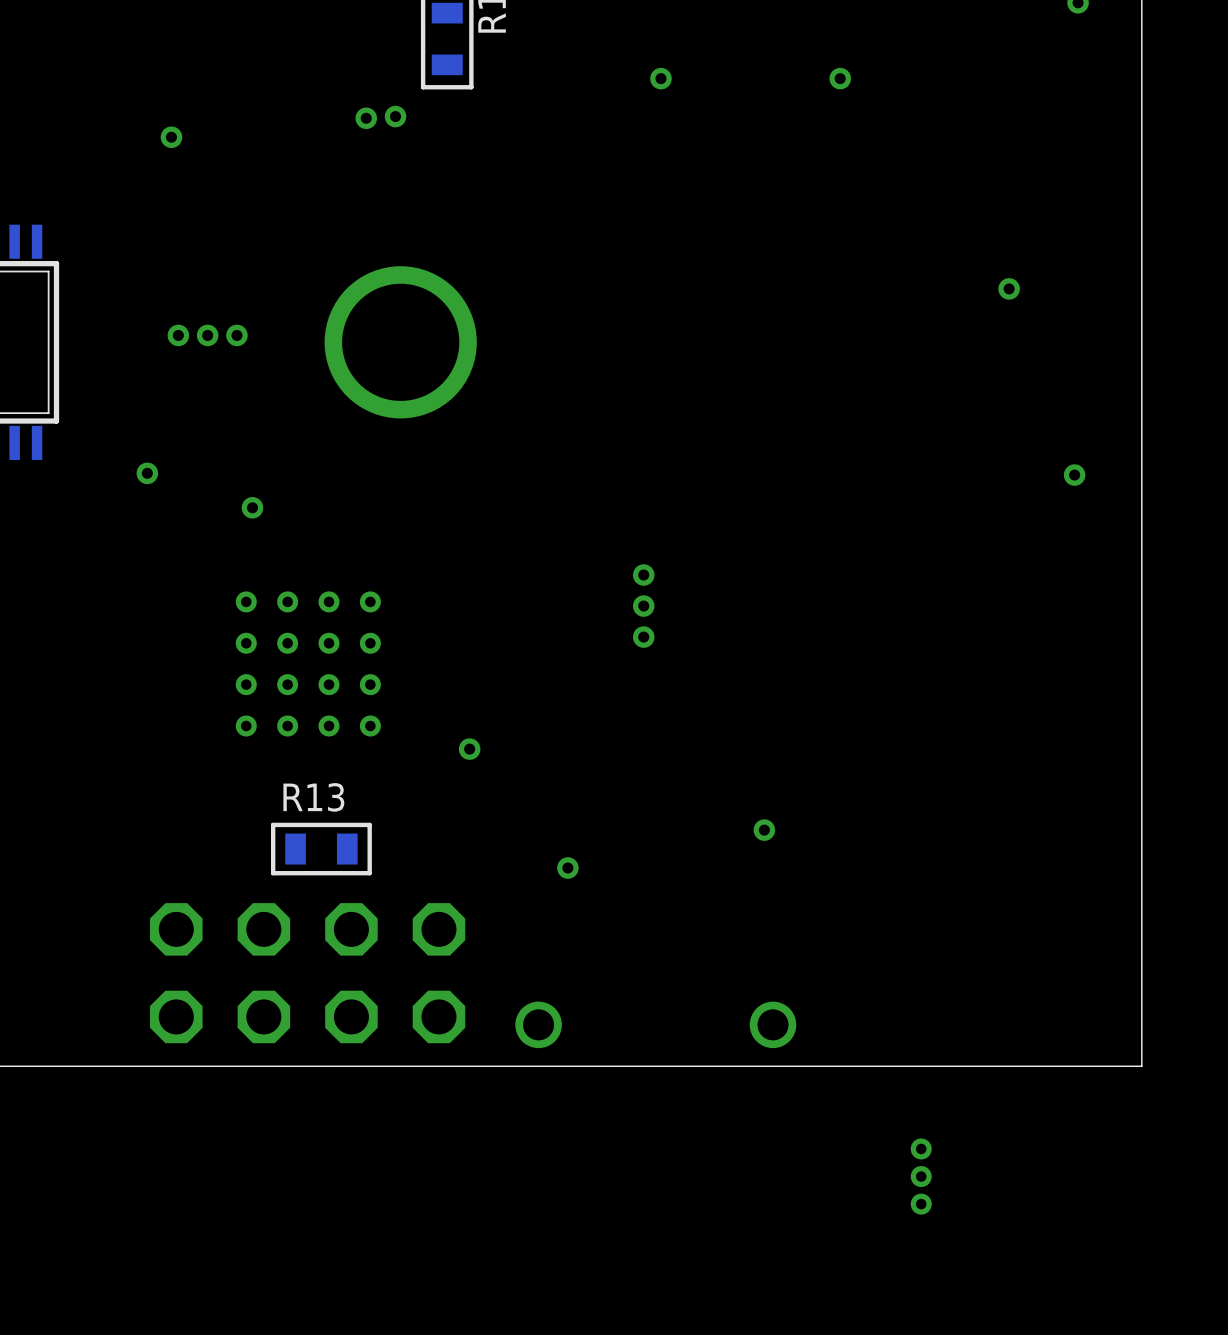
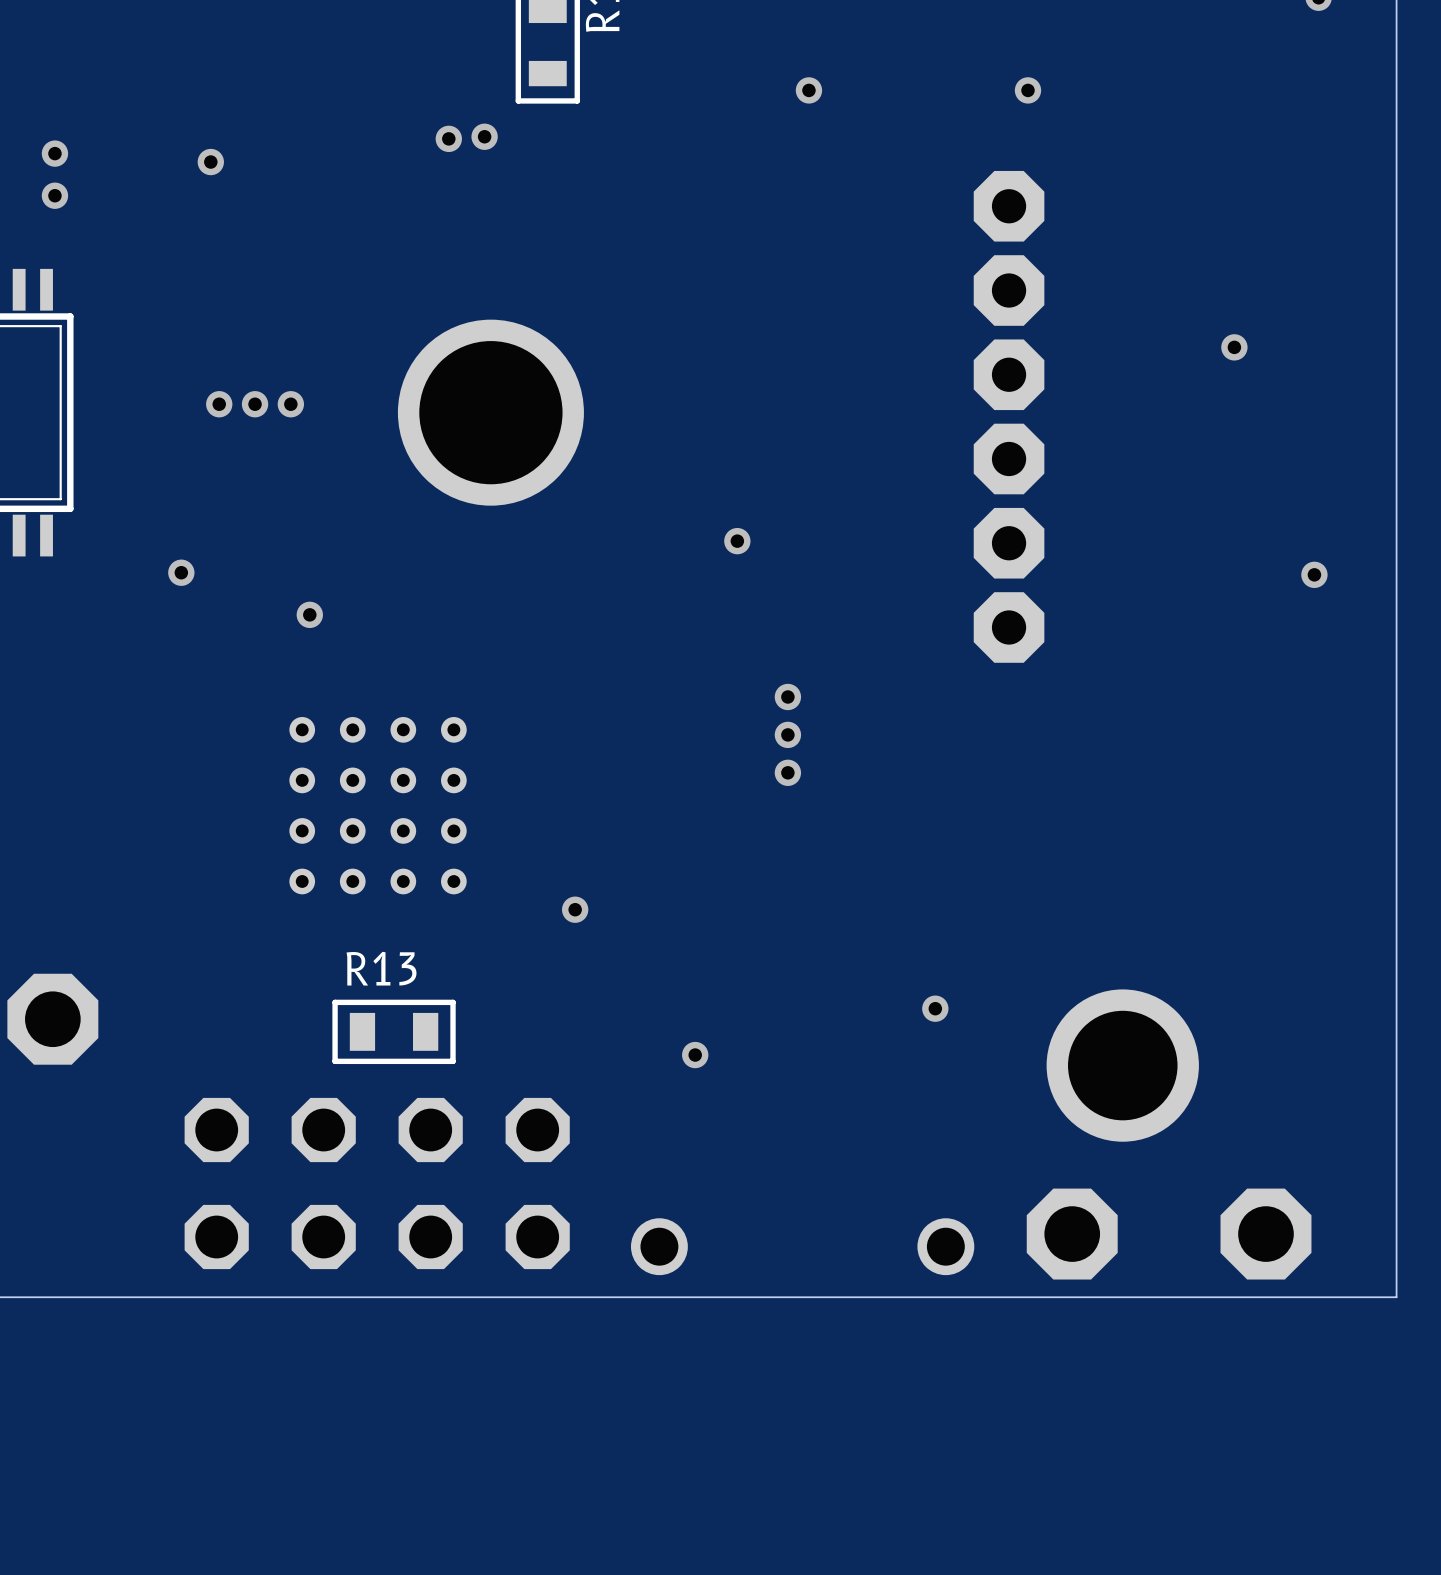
via: none -> (54, 153)
via: none -> (54, 195)
part: none -> (1009, 416)
via: none -> (737, 541)
part: none -> (52, 1019)
part: none -> (1122, 1065)
part: none -> (1072, 1234)
part: none -> (1265, 1234)
part: (921, 1176) -> none

